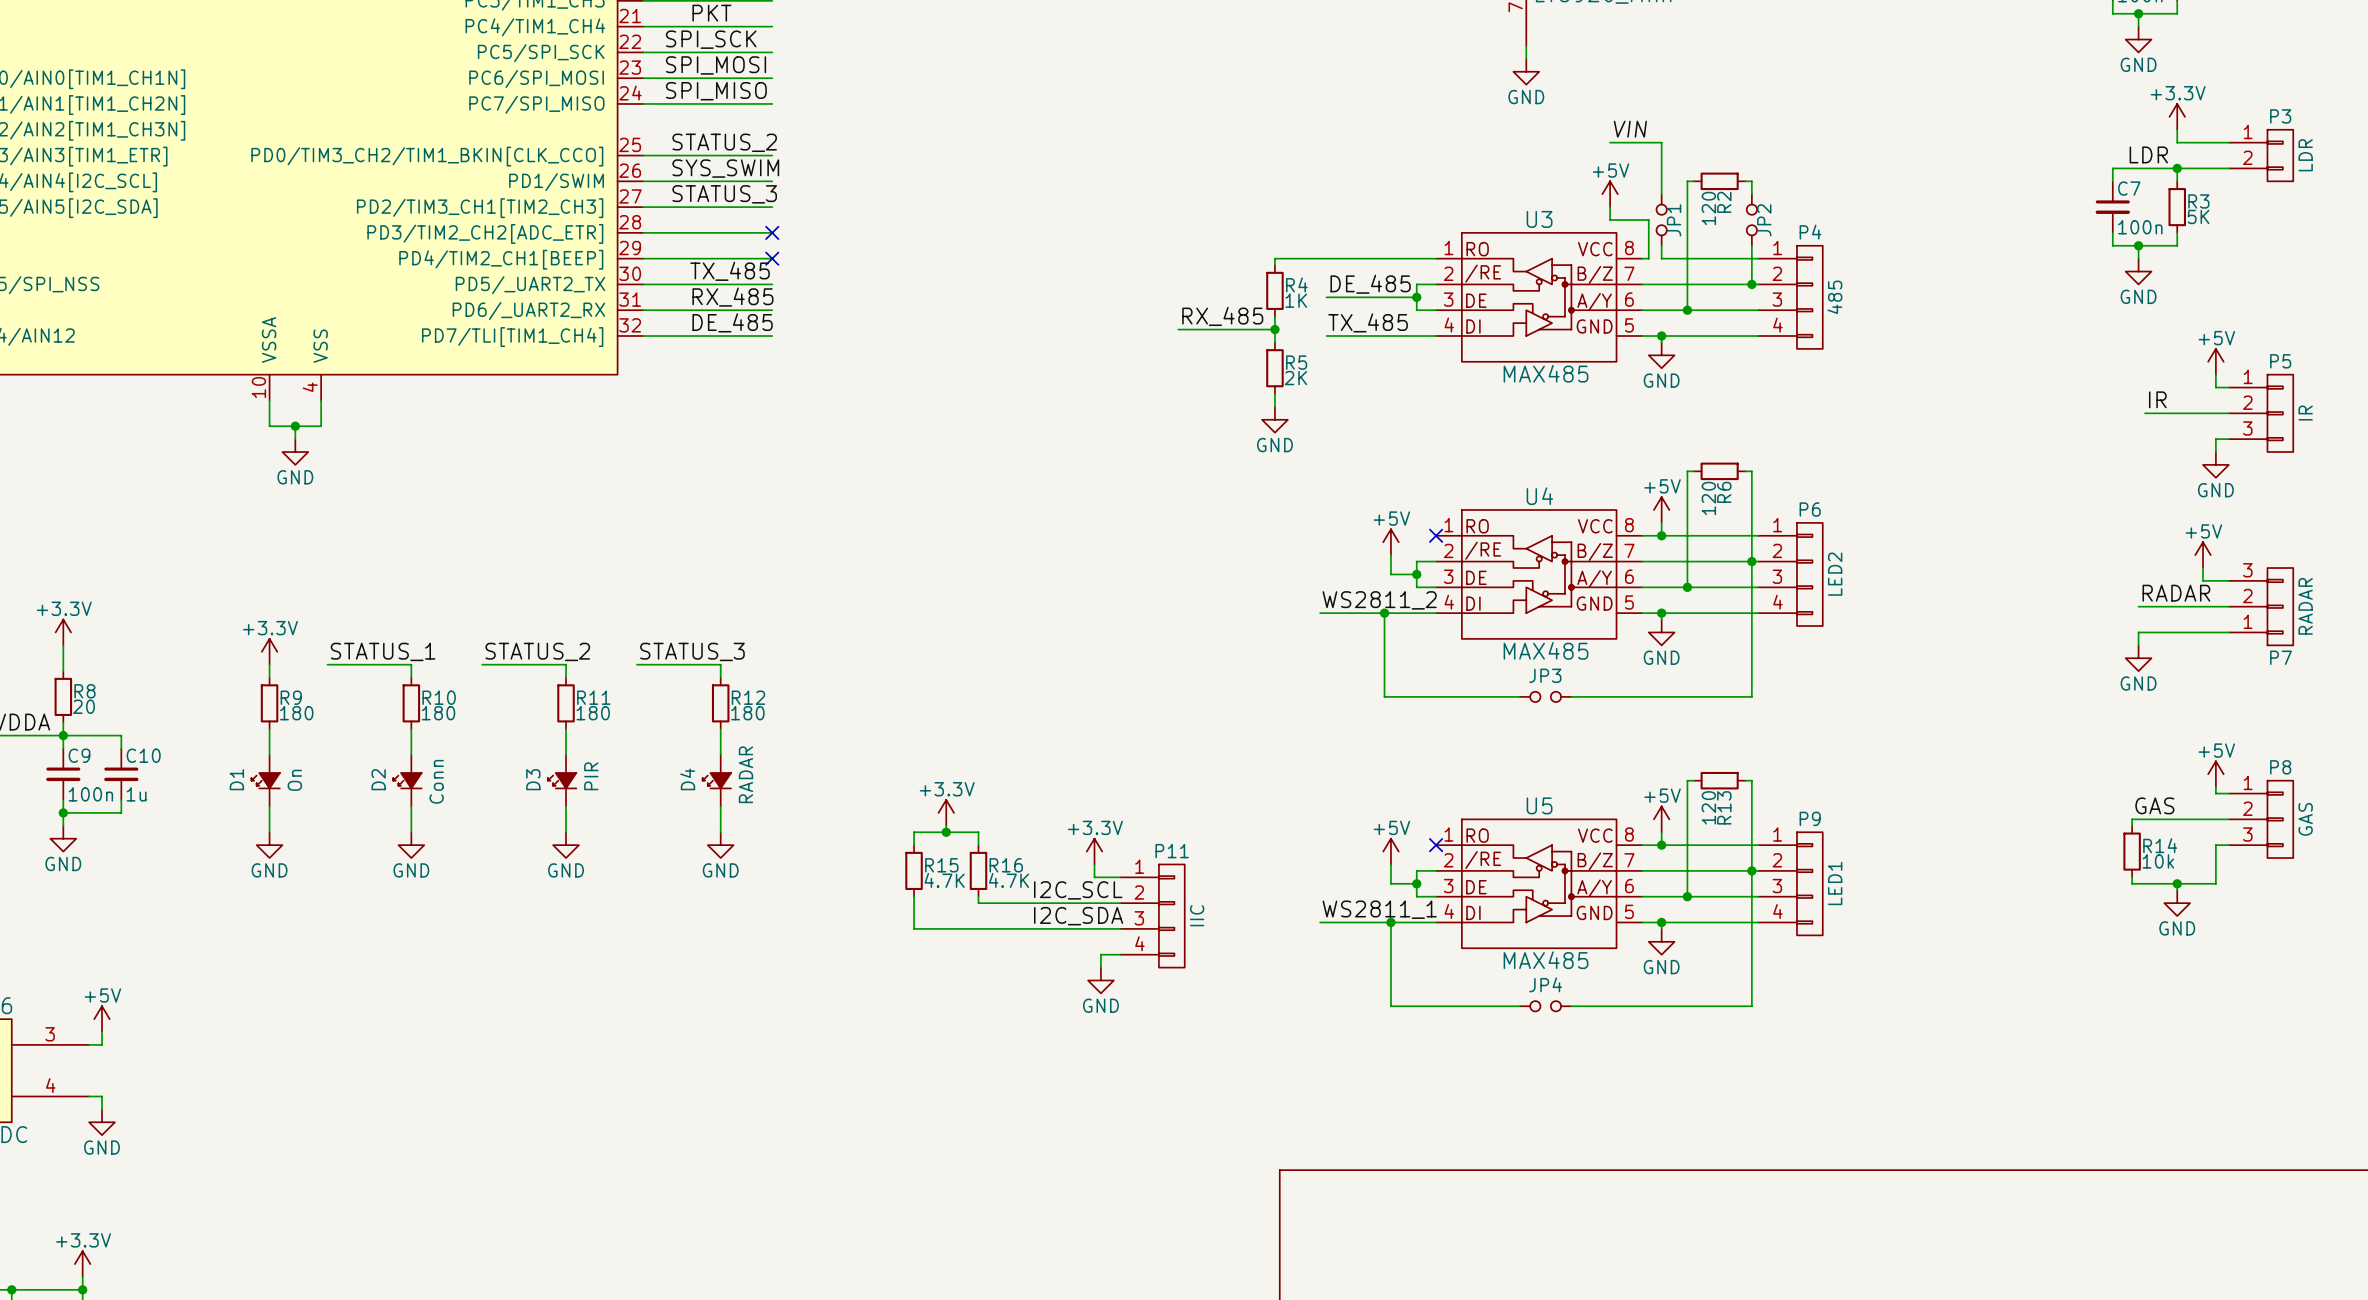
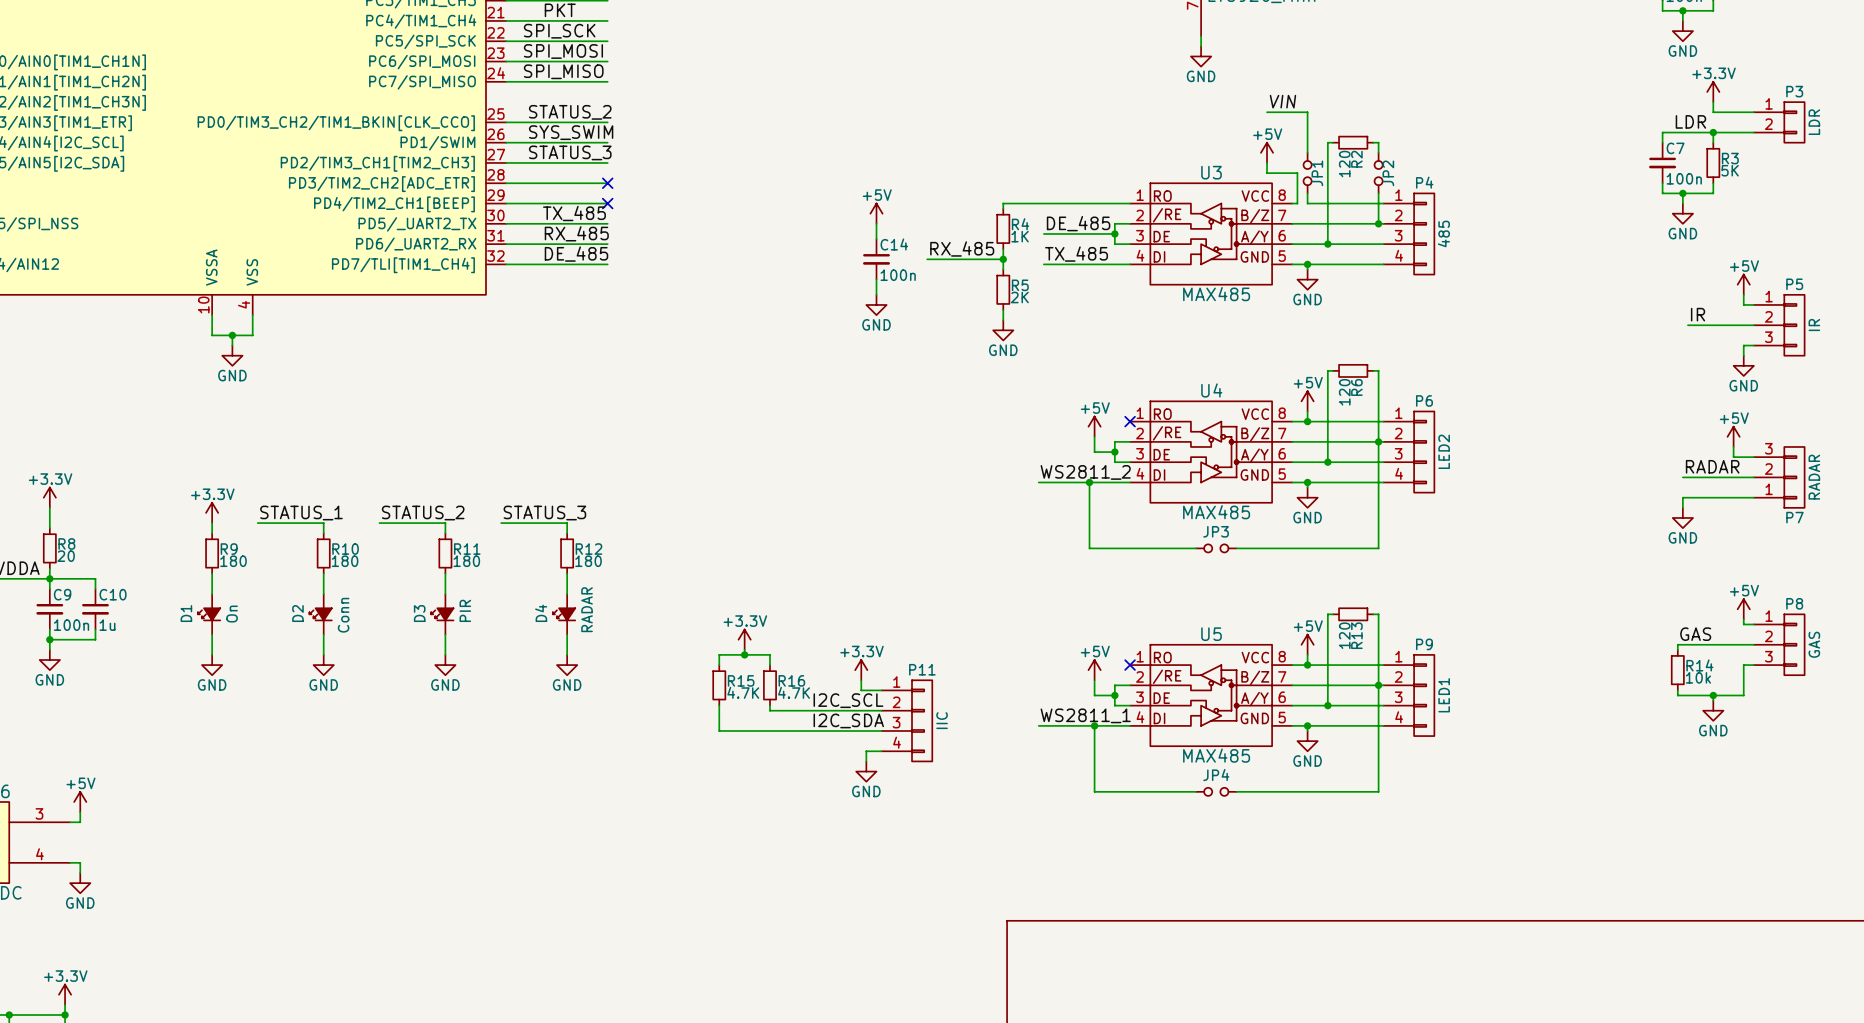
power symbol: none -> +5V (876, 213)
wire: none -> (876, 223) (876, 239)
C14: none -> 100n (876, 259)
wire: none -> (876, 279) (876, 294)
power symbol: none -> GND (876, 304)

